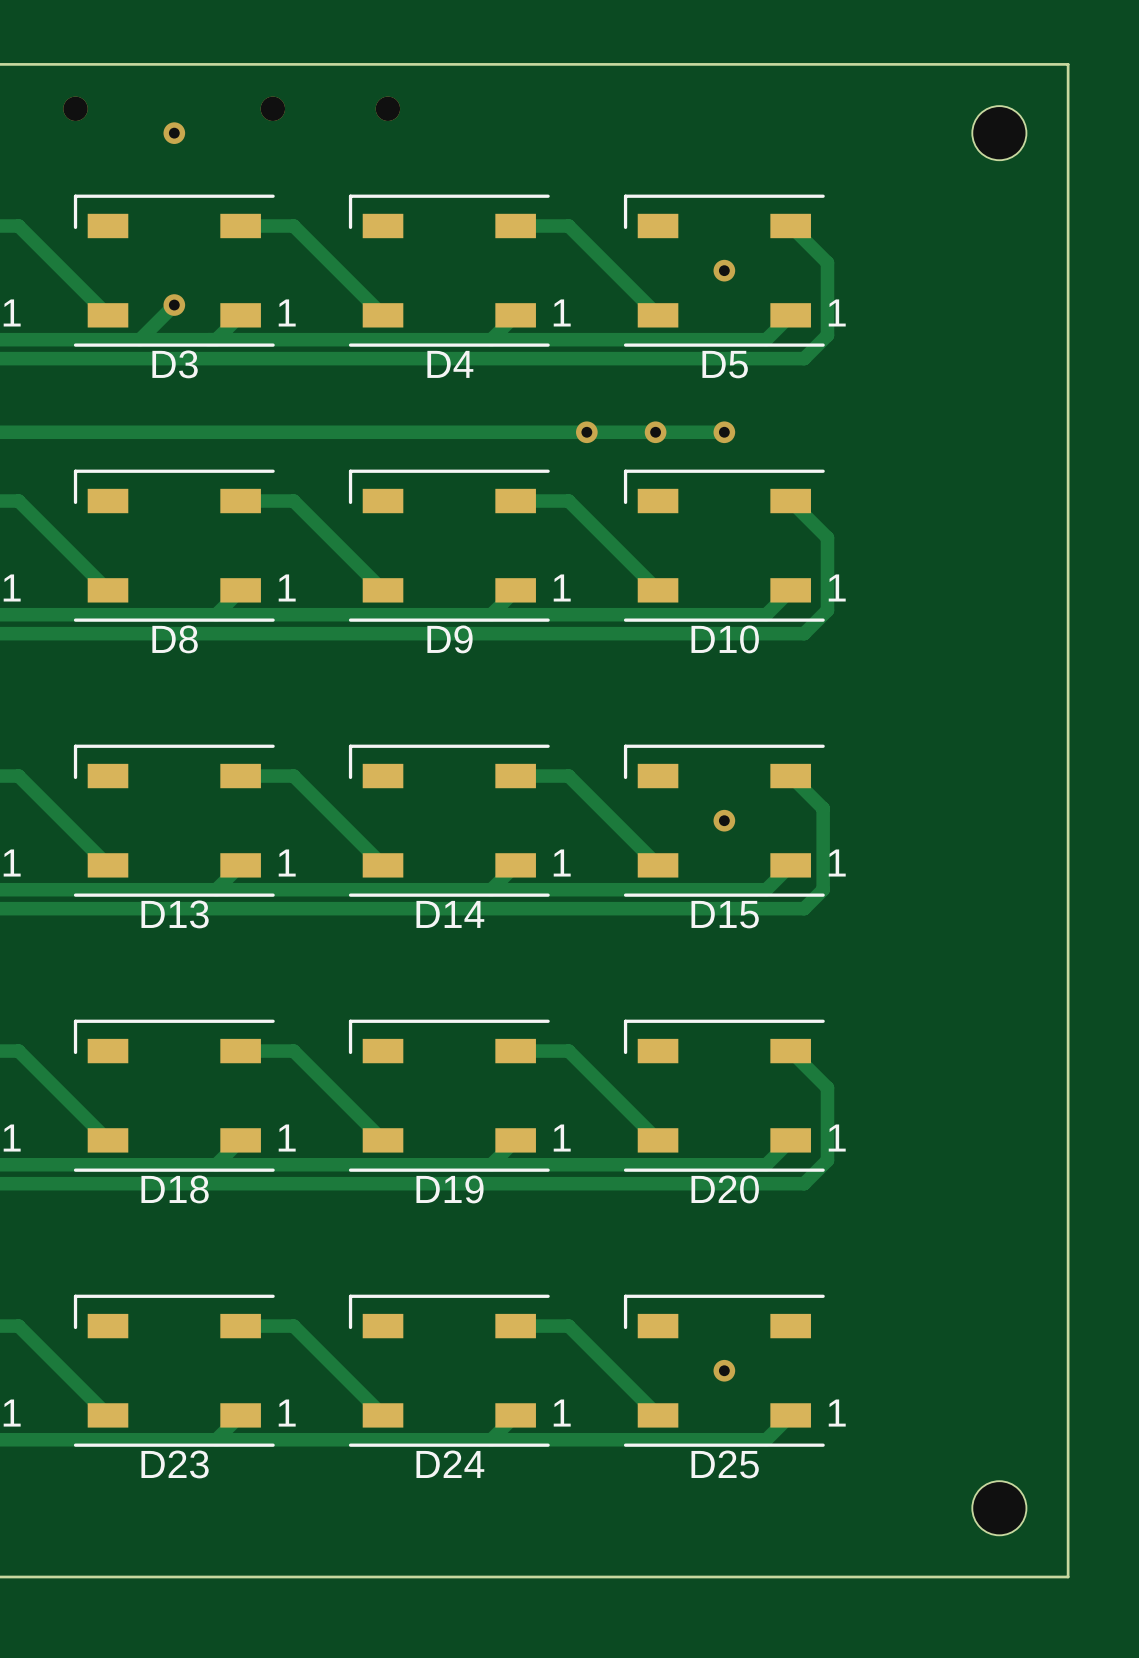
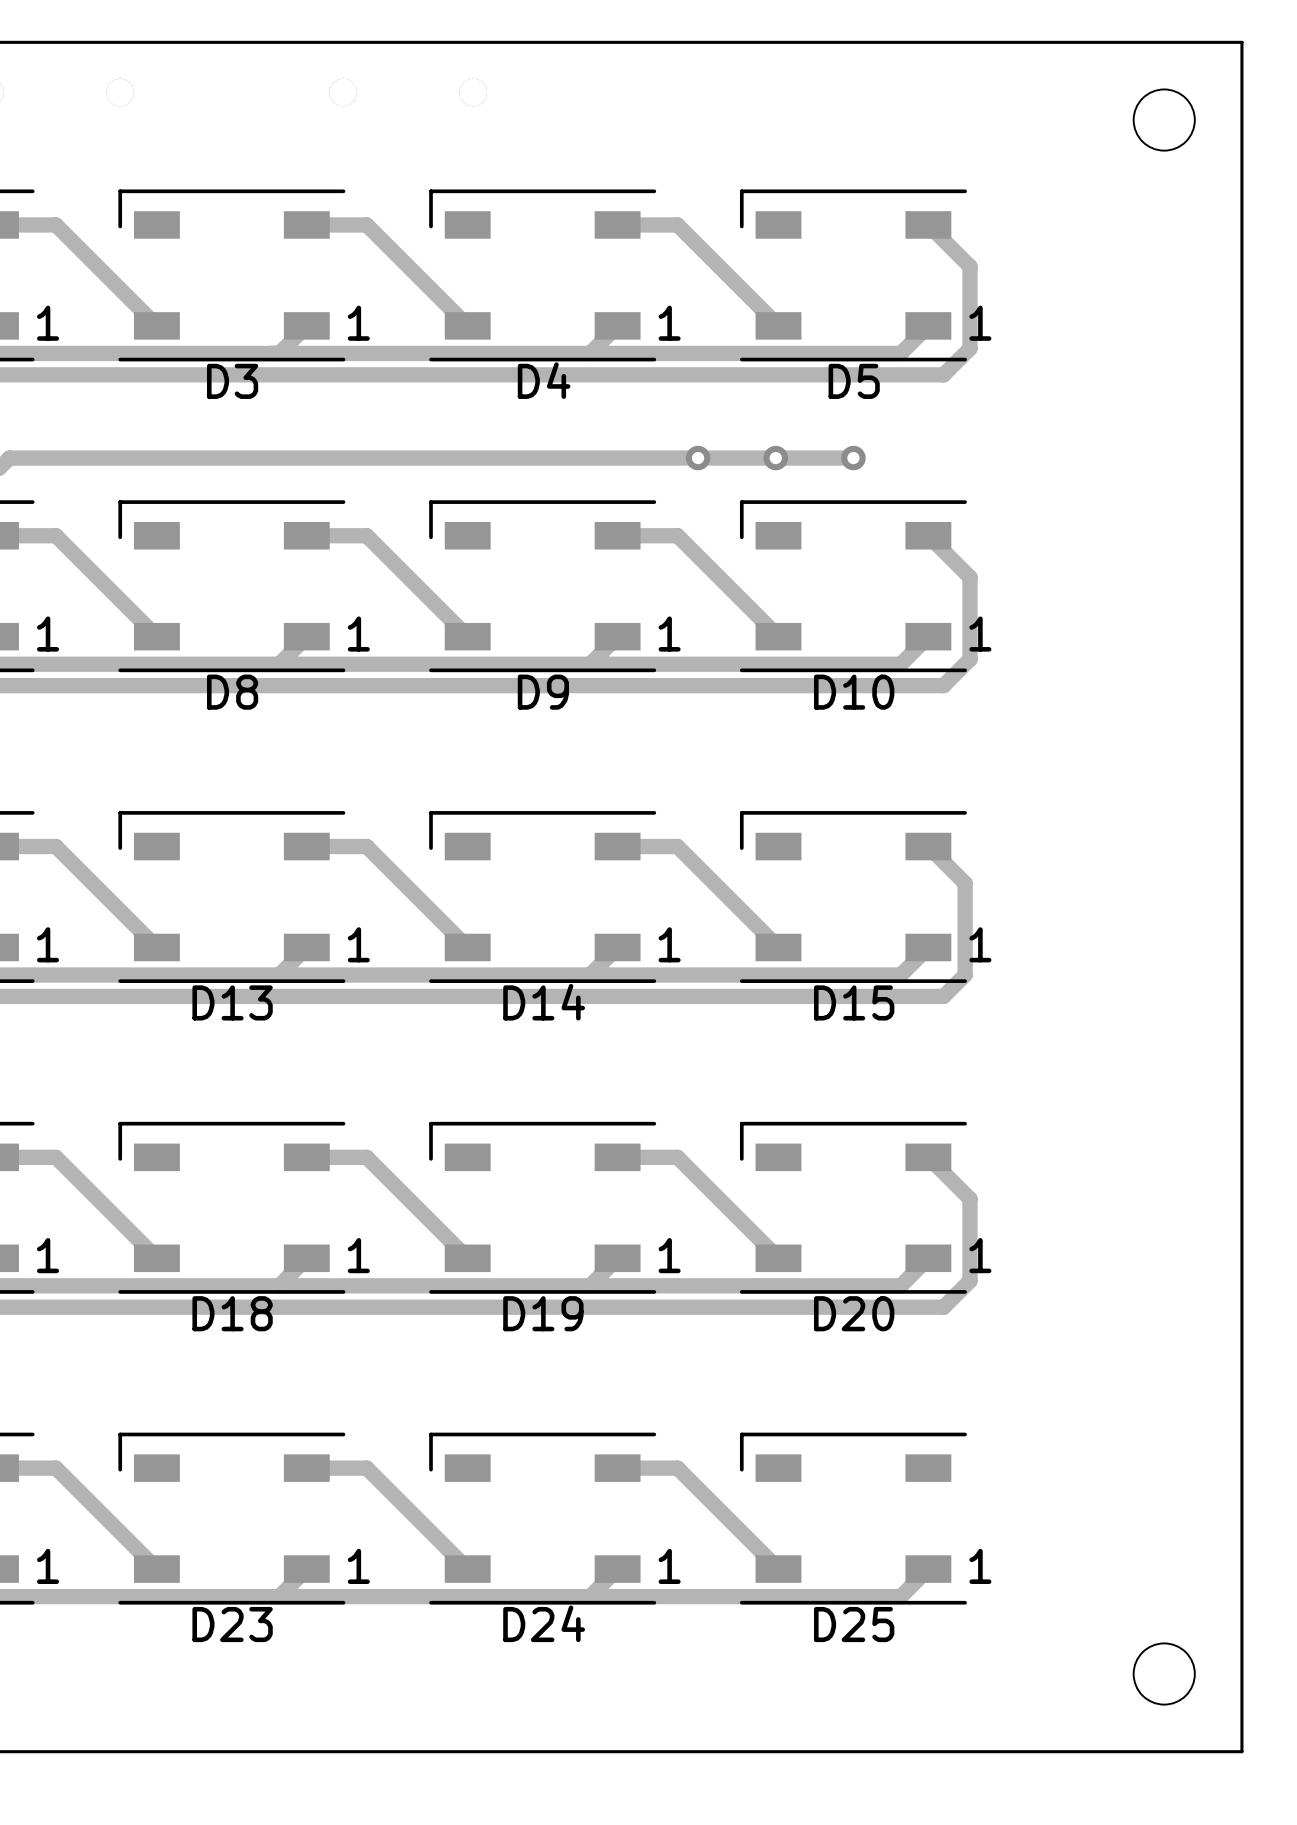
via: (174, 133) -> none
via: (724, 270) -> none
track: (174, 305) (139, 339) -> none
via: (174, 305) -> none
via: (724, 820) -> none
via: (724, 1370) -> none

